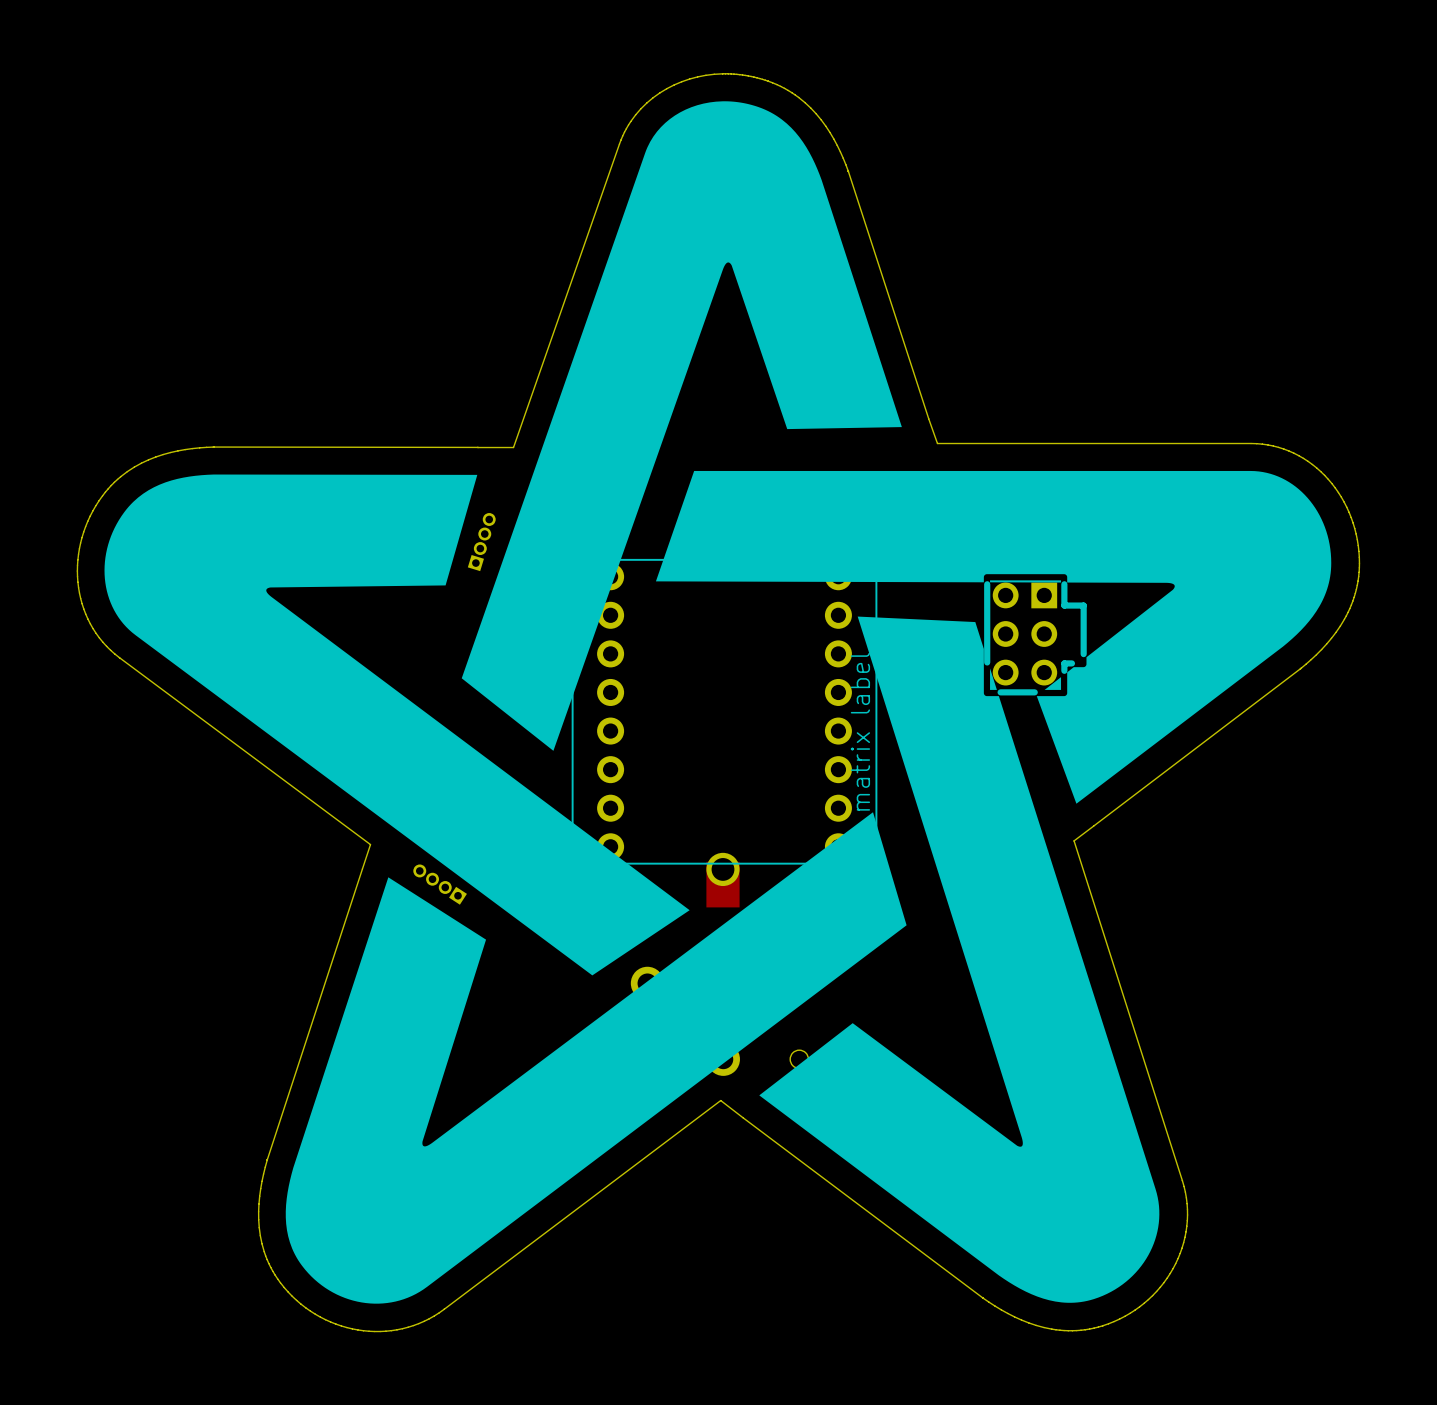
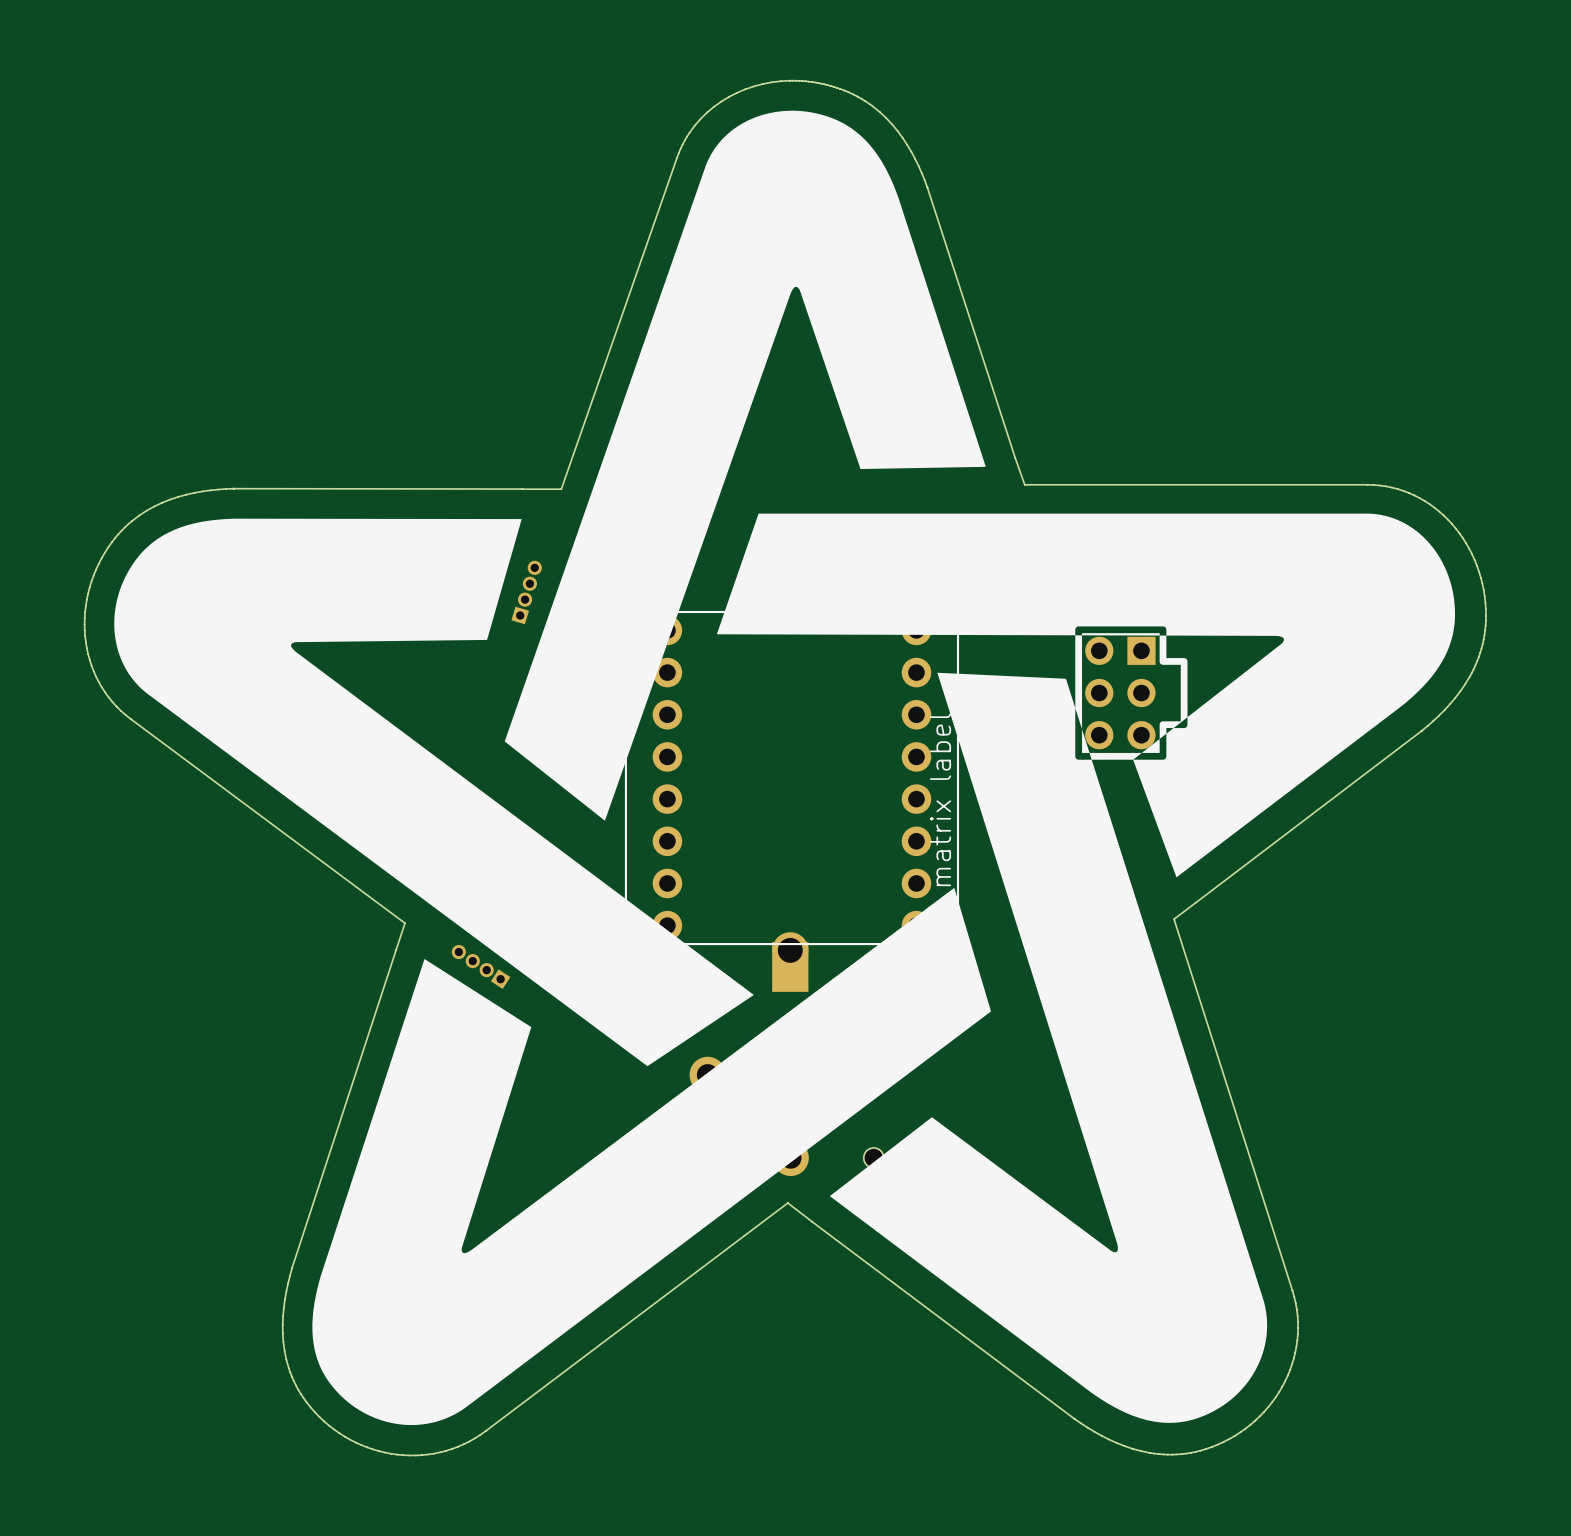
drawing: none -> [716, 513, 1456, 1423]
drawing: [655, 470, 1332, 1303] -> none
line: (987, 584) (987, 662) -> none
line: (1064, 584) (1064, 605) (1083, 605) (1083, 654) -> none
line: (1071, 663) (1064, 663) (1064, 670) -> none
line: (1000, 692) (1034, 692) -> none

